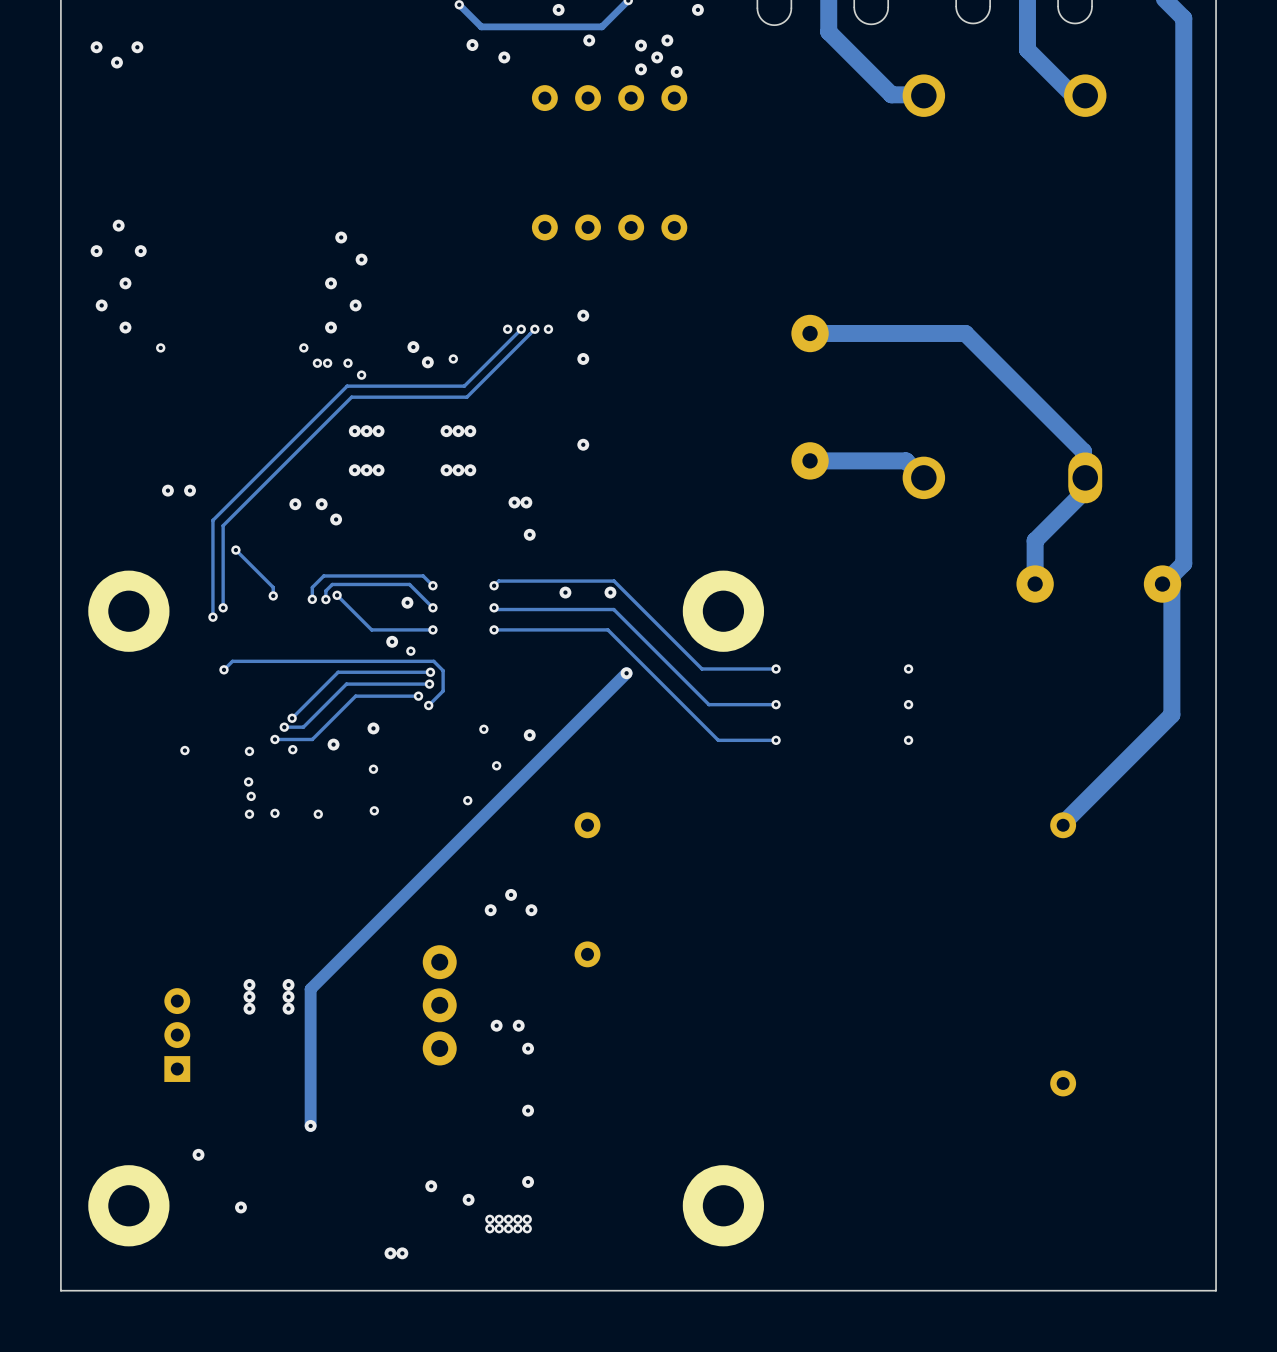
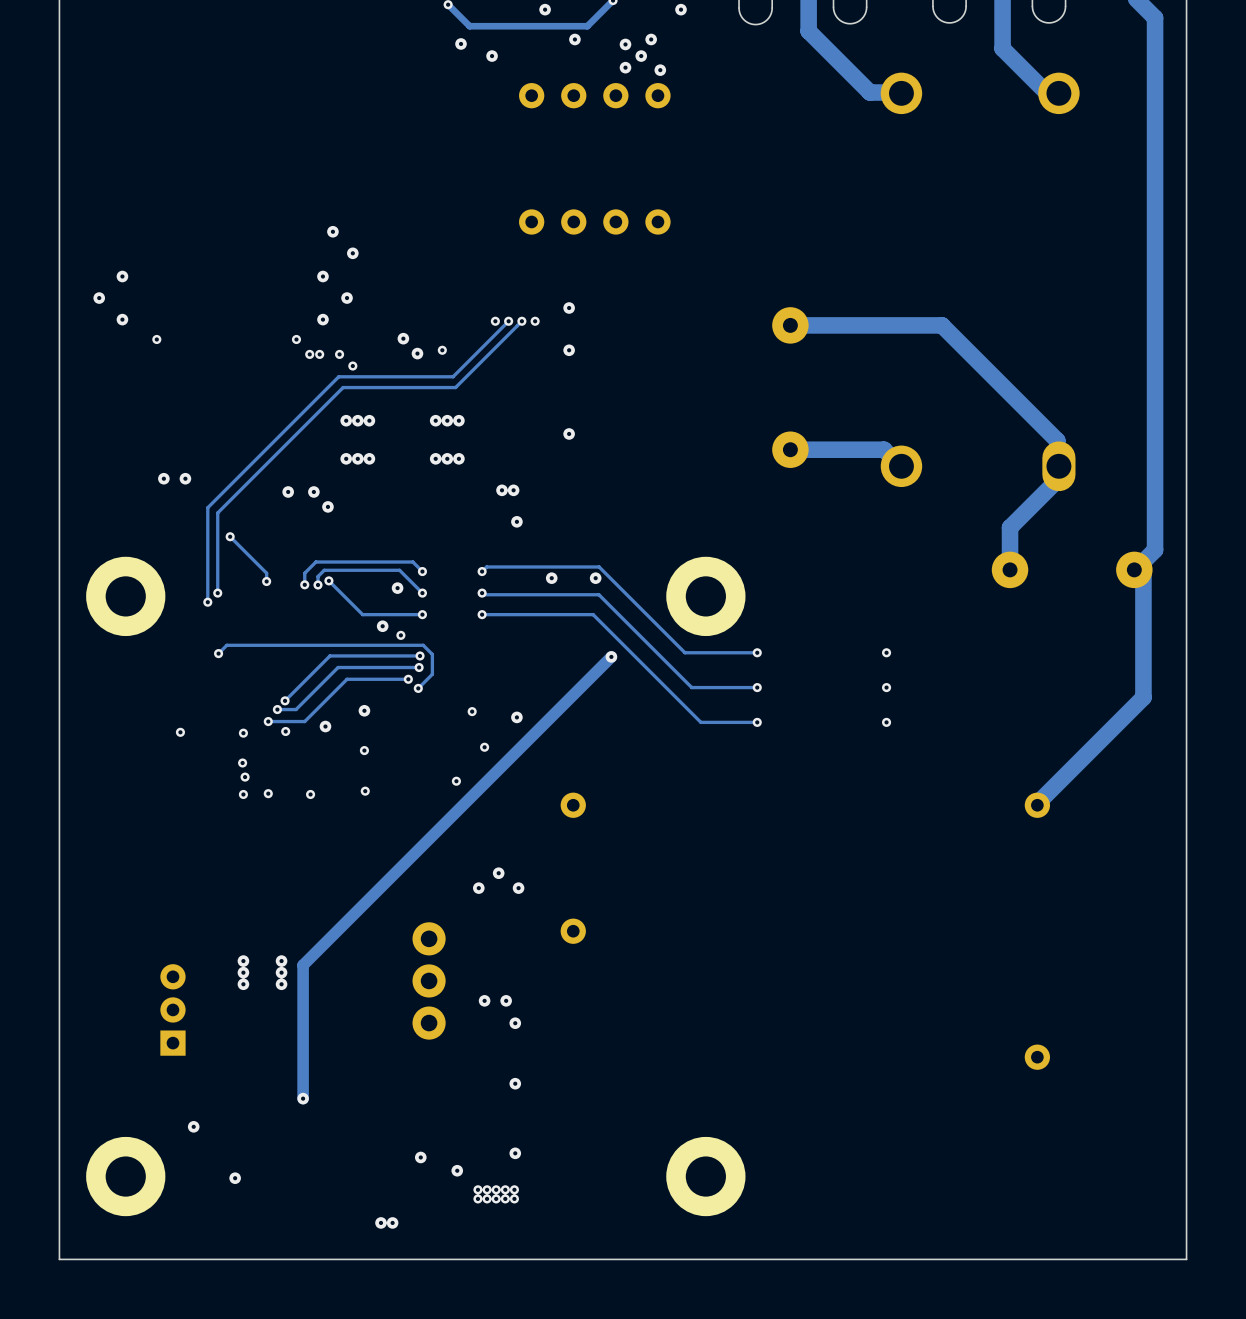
via: (96, 47) -> none
via: (137, 47) -> none
via: (116, 62) -> none
via: (118, 225) -> none
via: (96, 251) -> none
via: (140, 251) -> none

